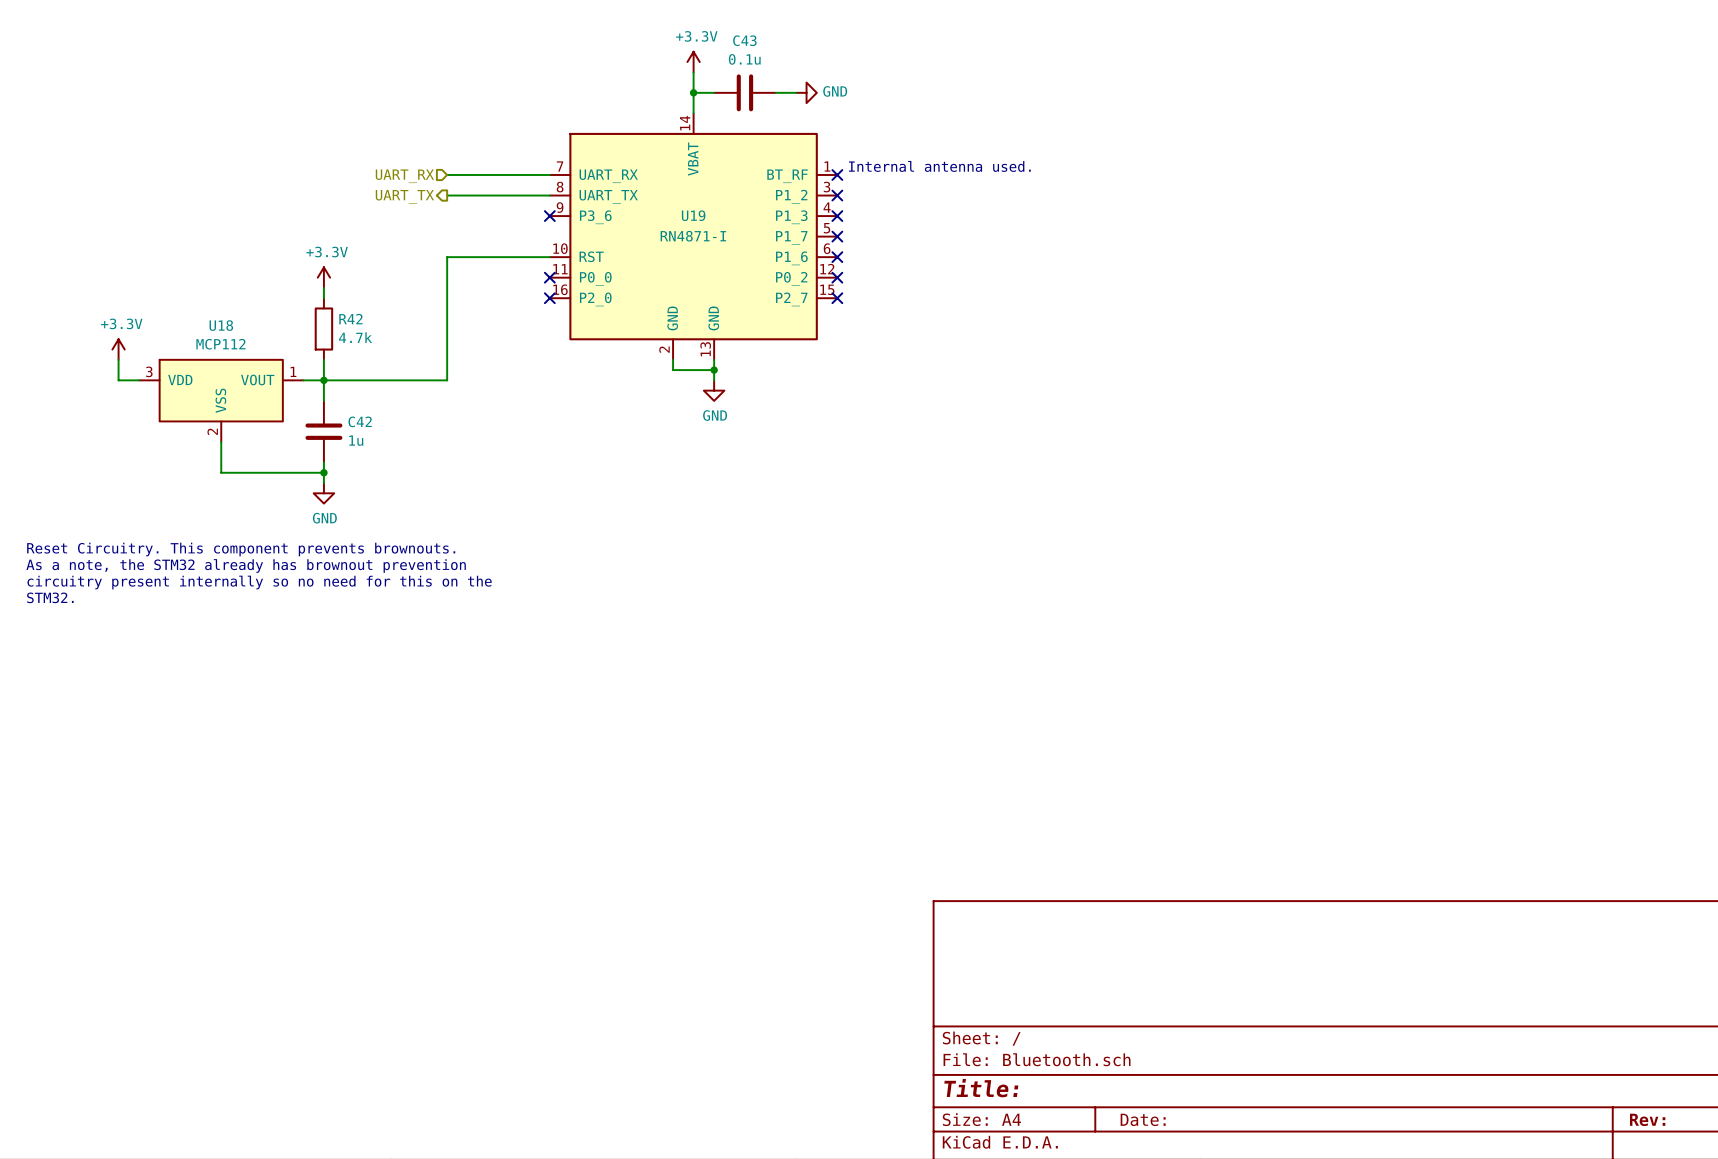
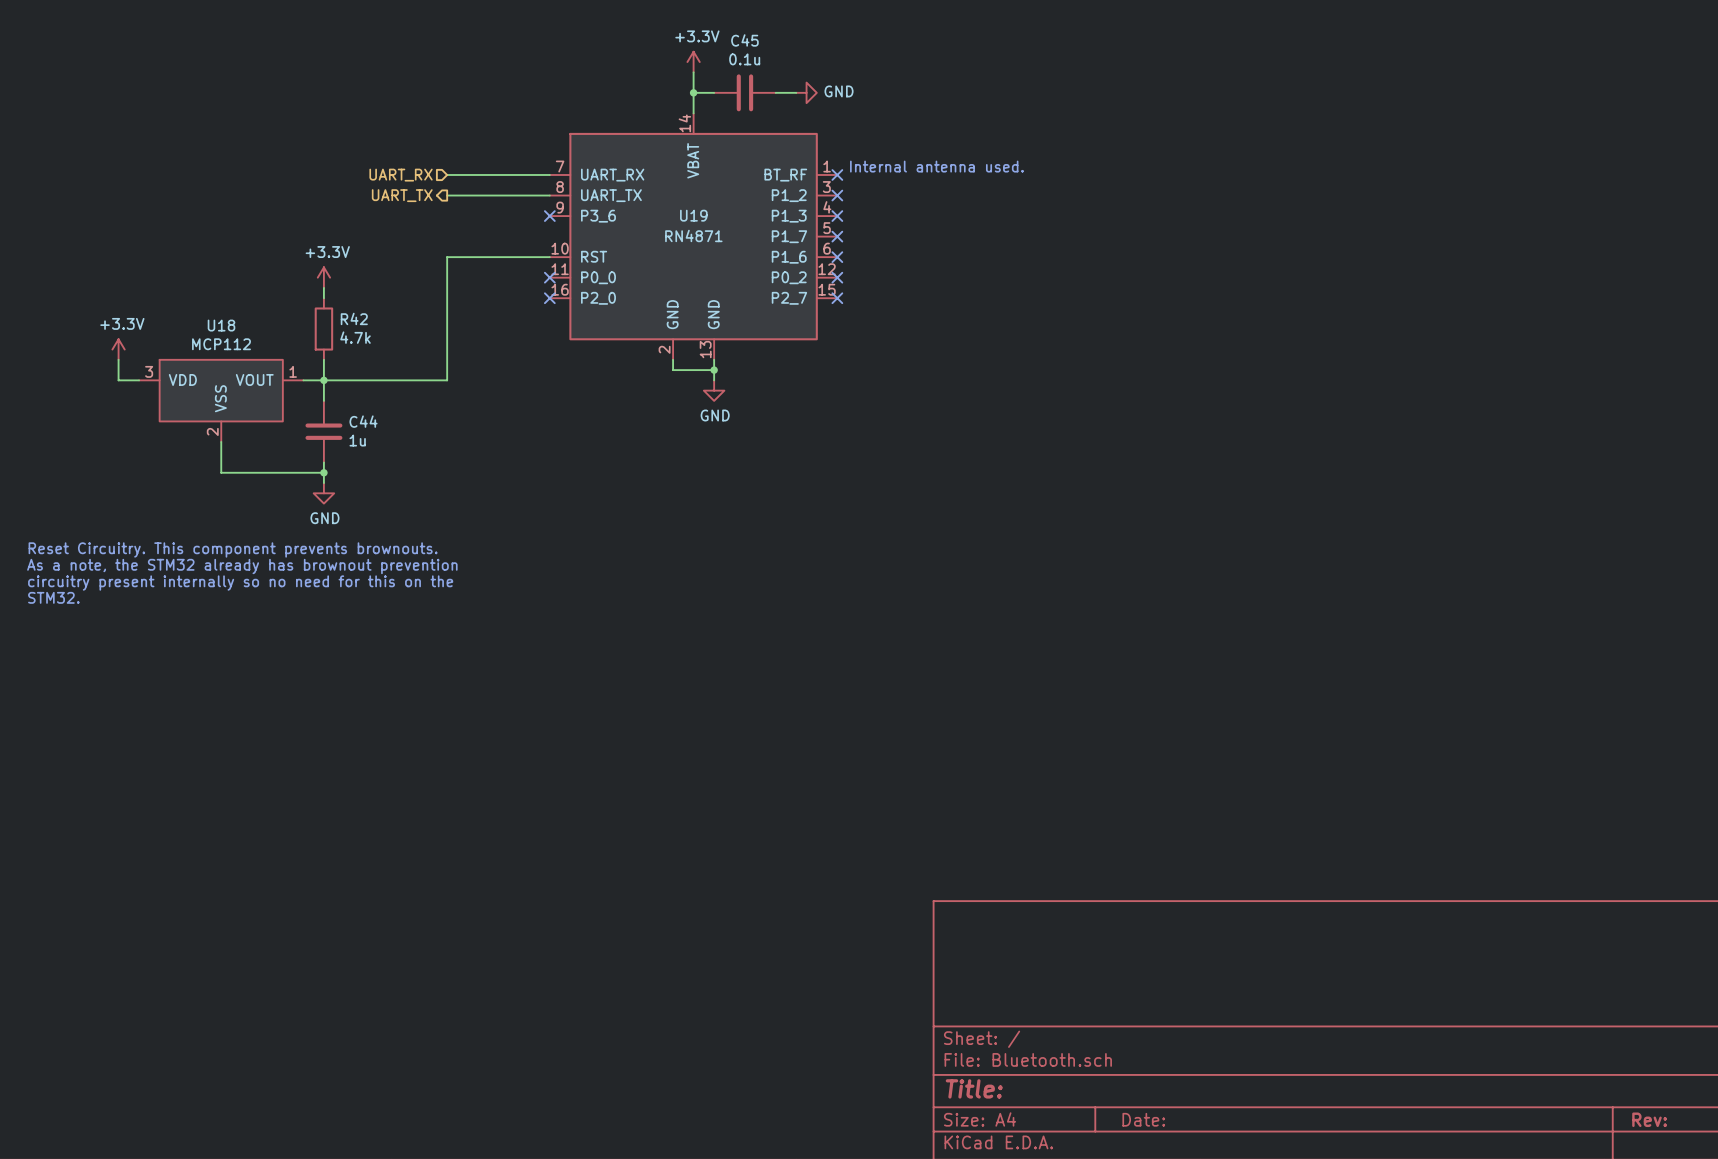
C43 name: C43 (744, 40) -> C45 (744, 40)
U19 value: RN4871-I (693, 236) -> RN4871 (693, 235)
C42 name: C42 (360, 421) -> C44 (363, 421)

